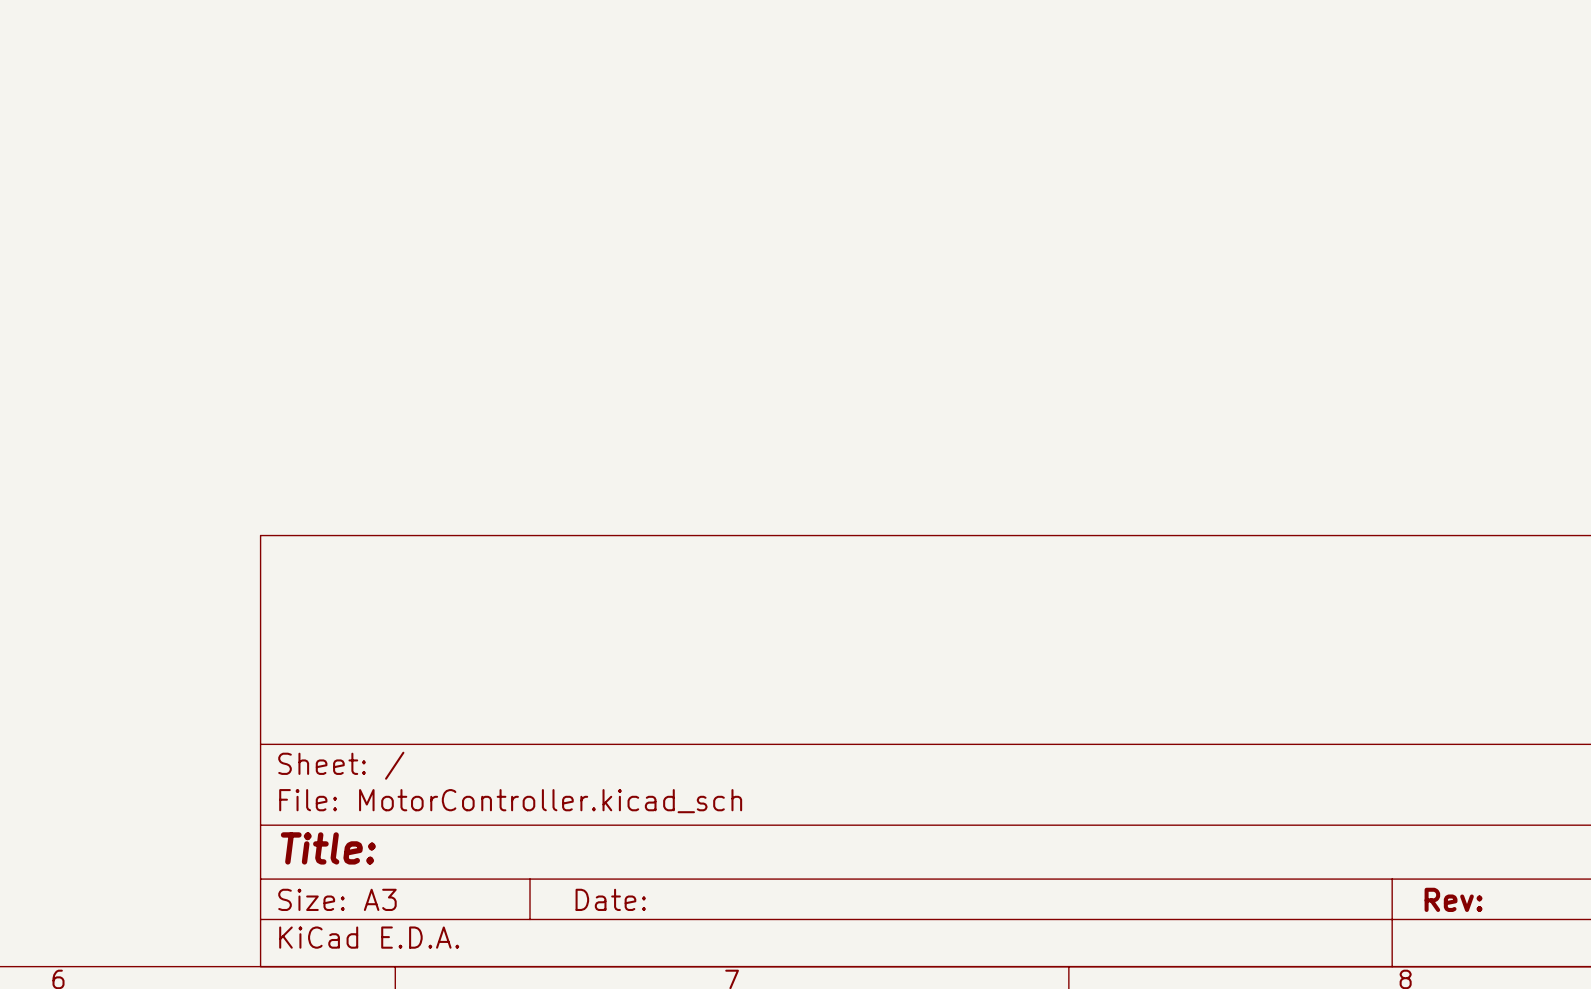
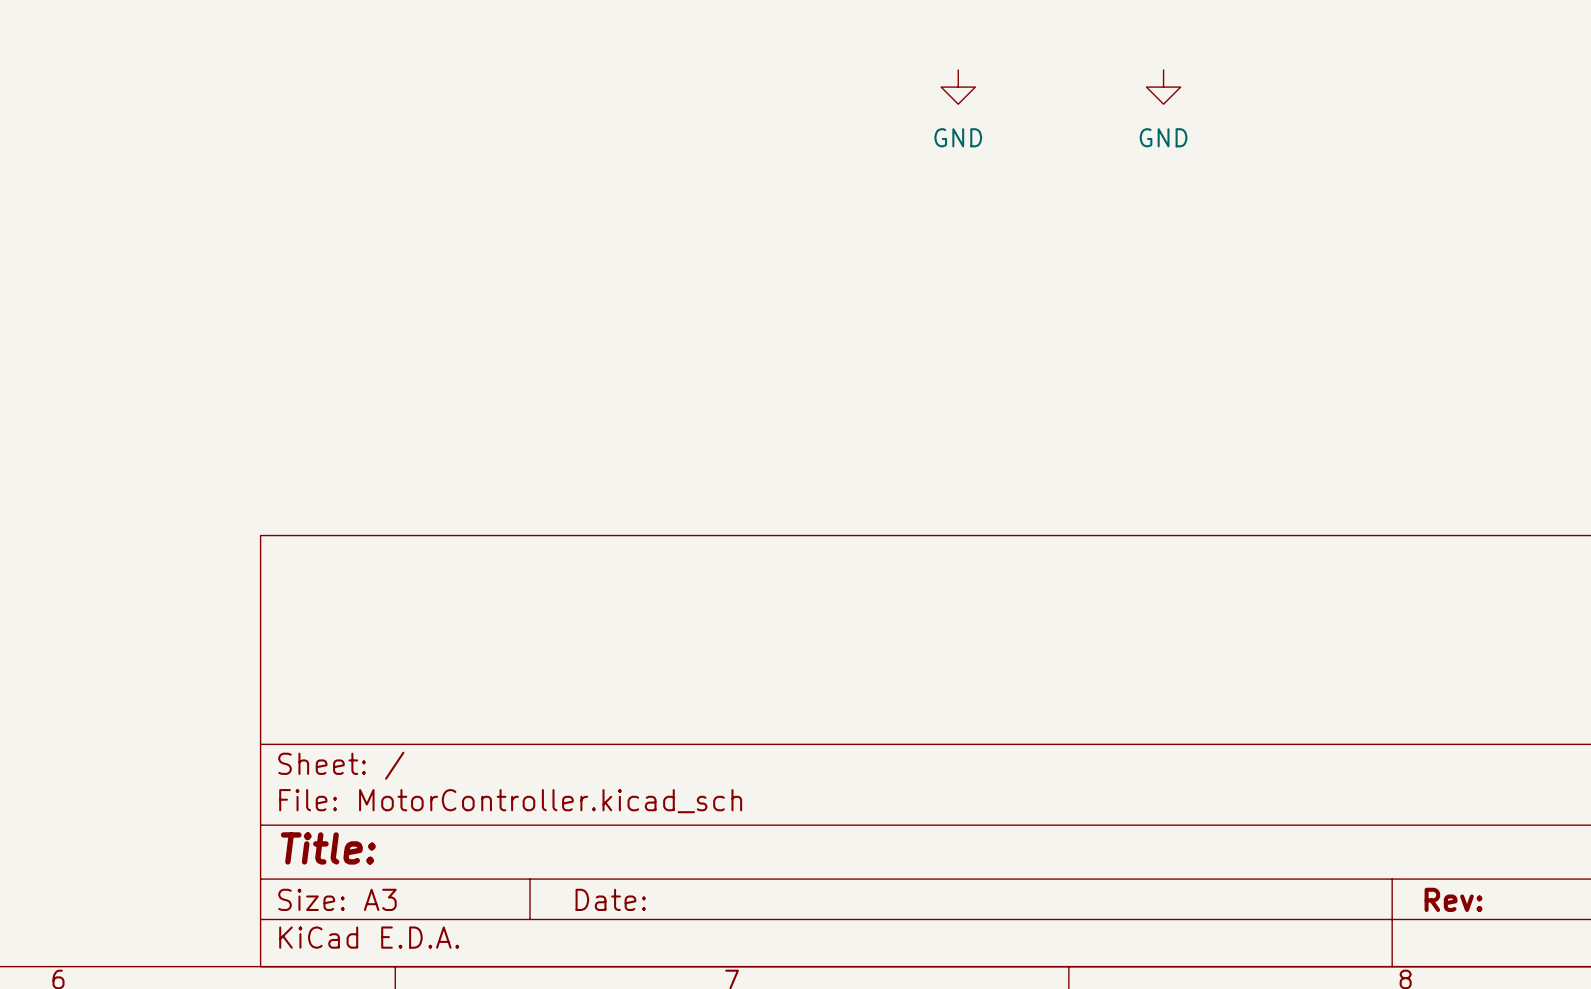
power symbol: none -> GND (958, 87)
power symbol: none -> GND (1163, 87)

